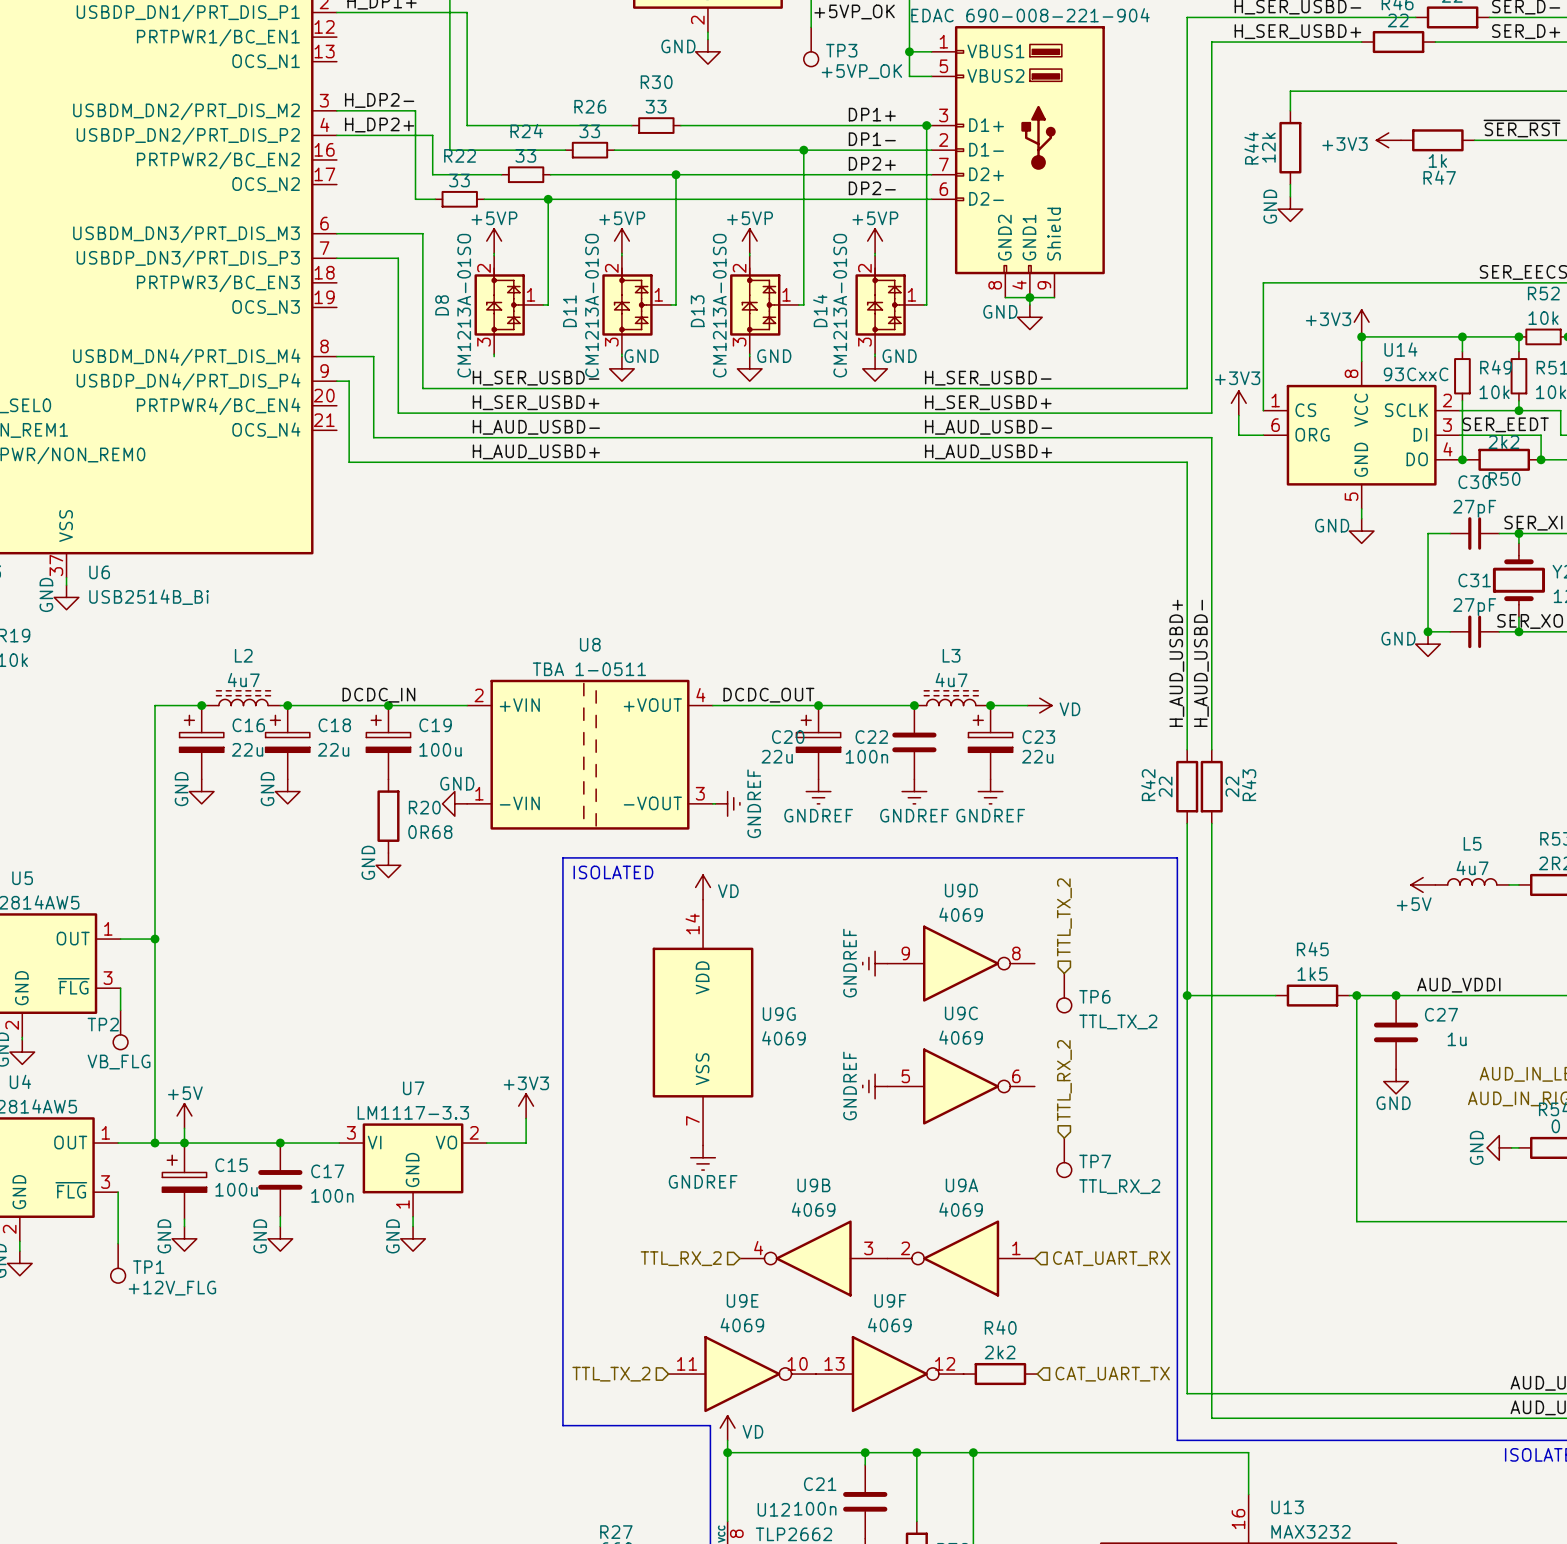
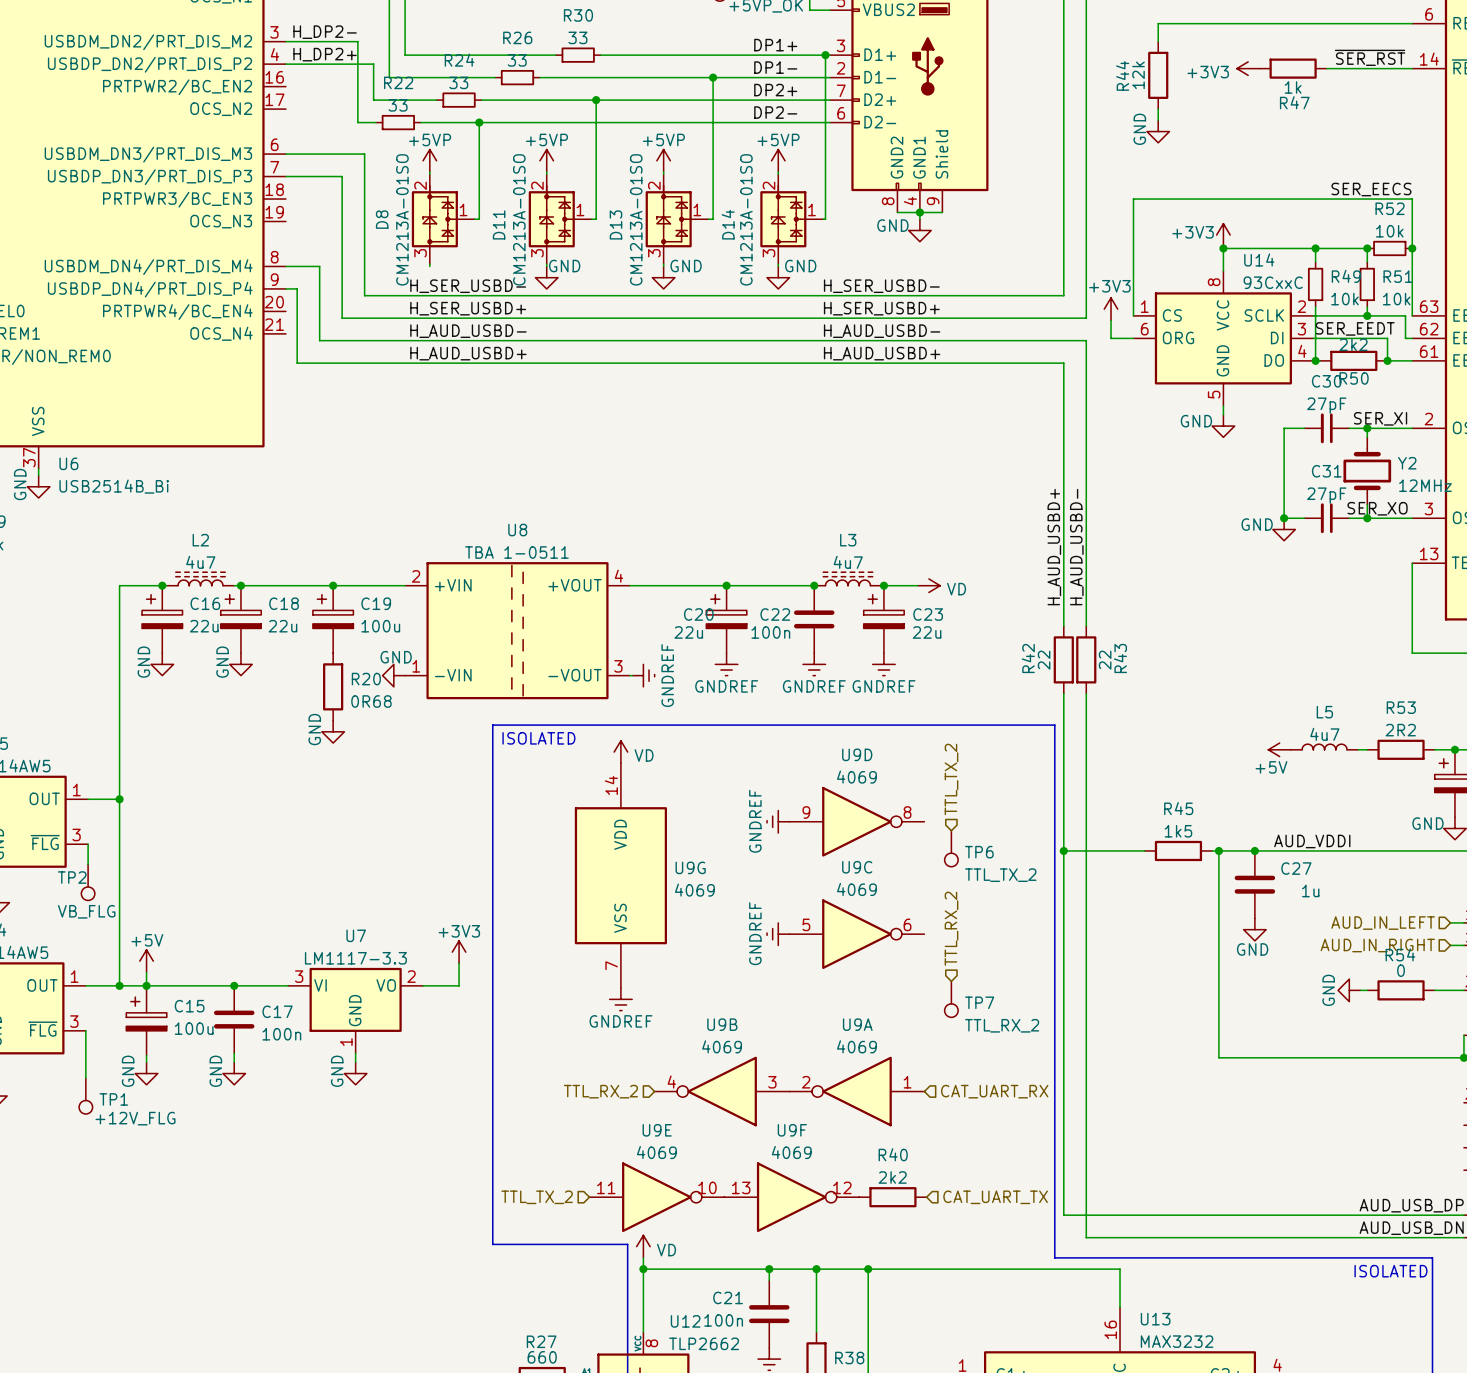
label: DCDC_IN (378, 695) -> none
label: DCDC_OUT (768, 695) -> none

